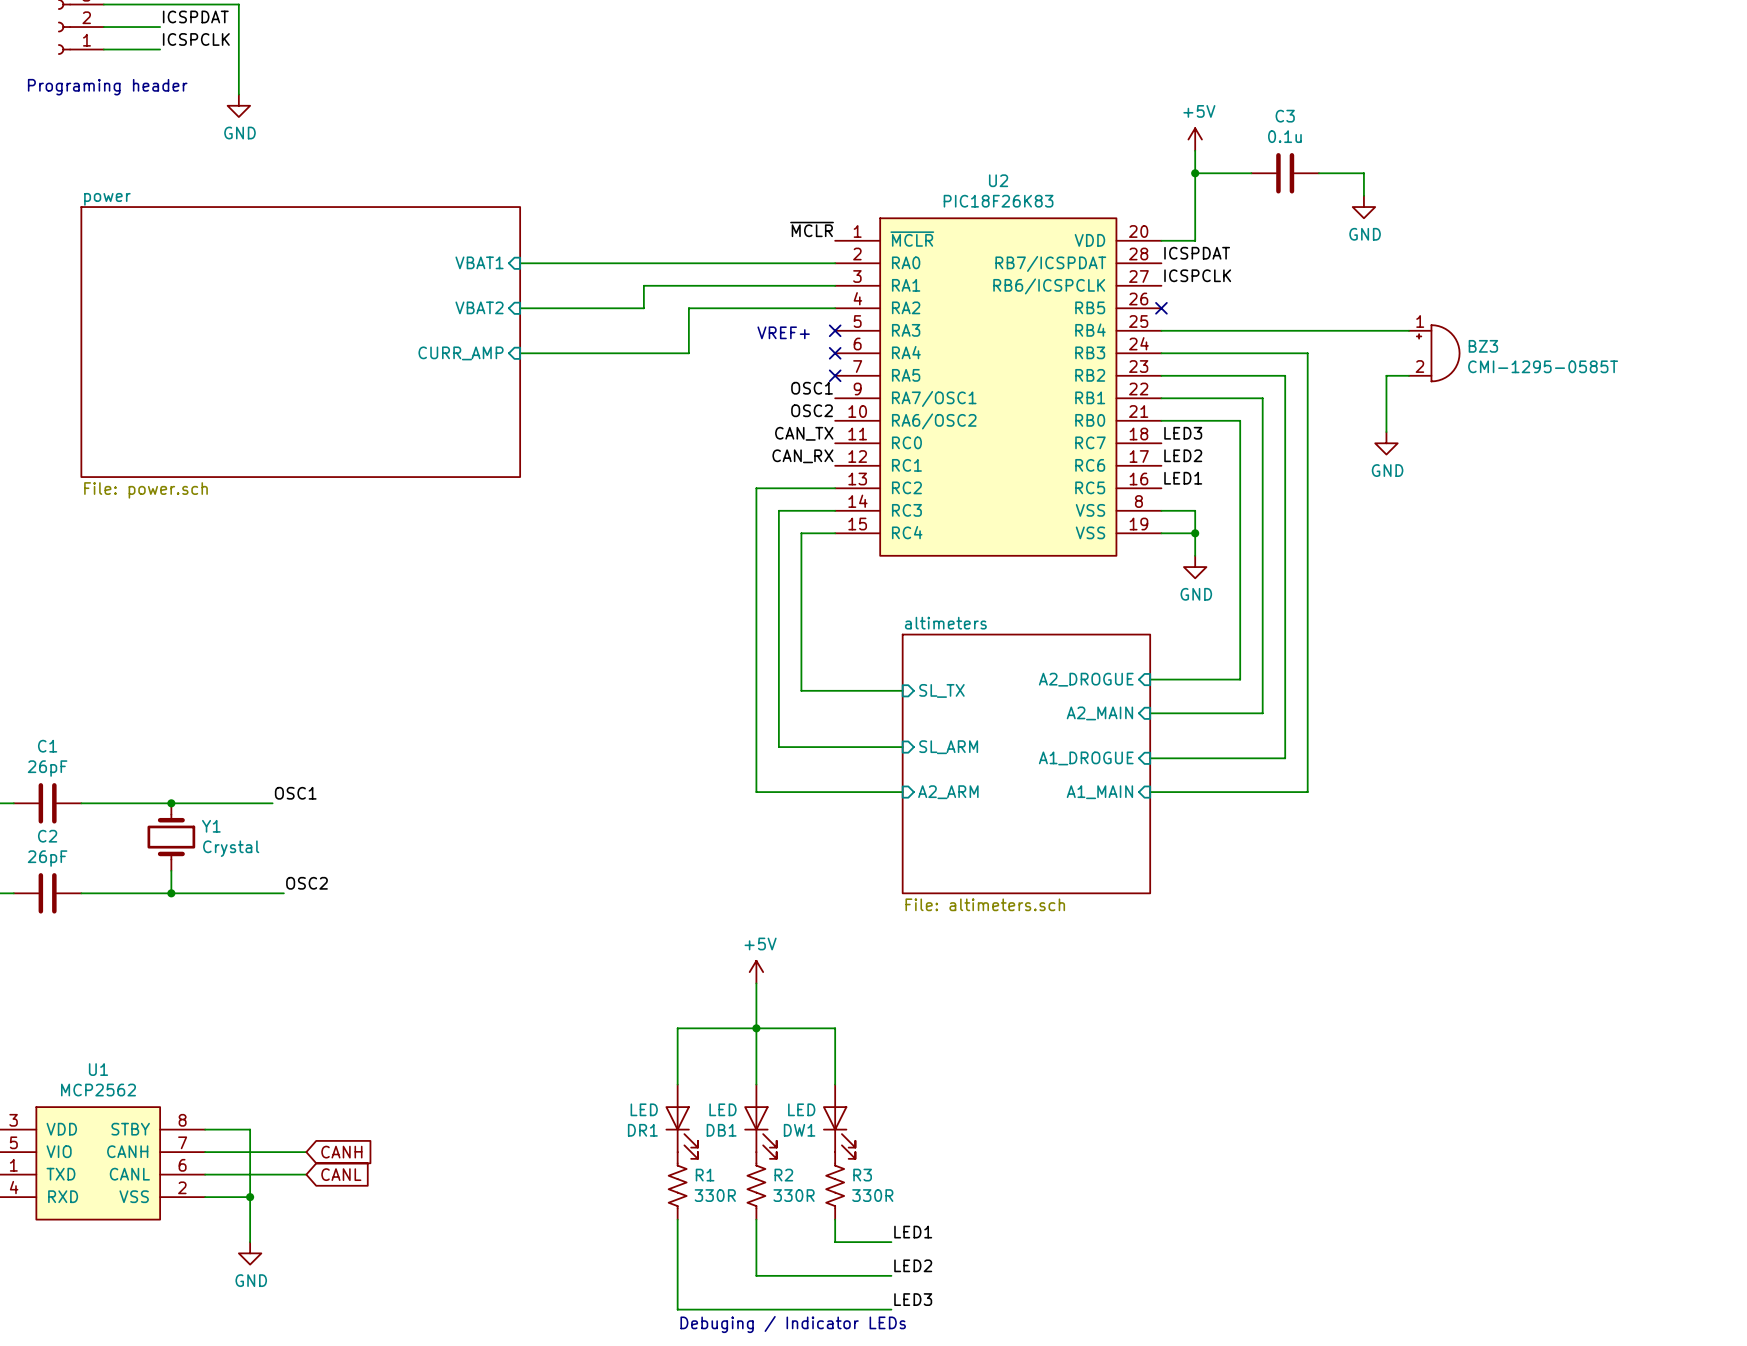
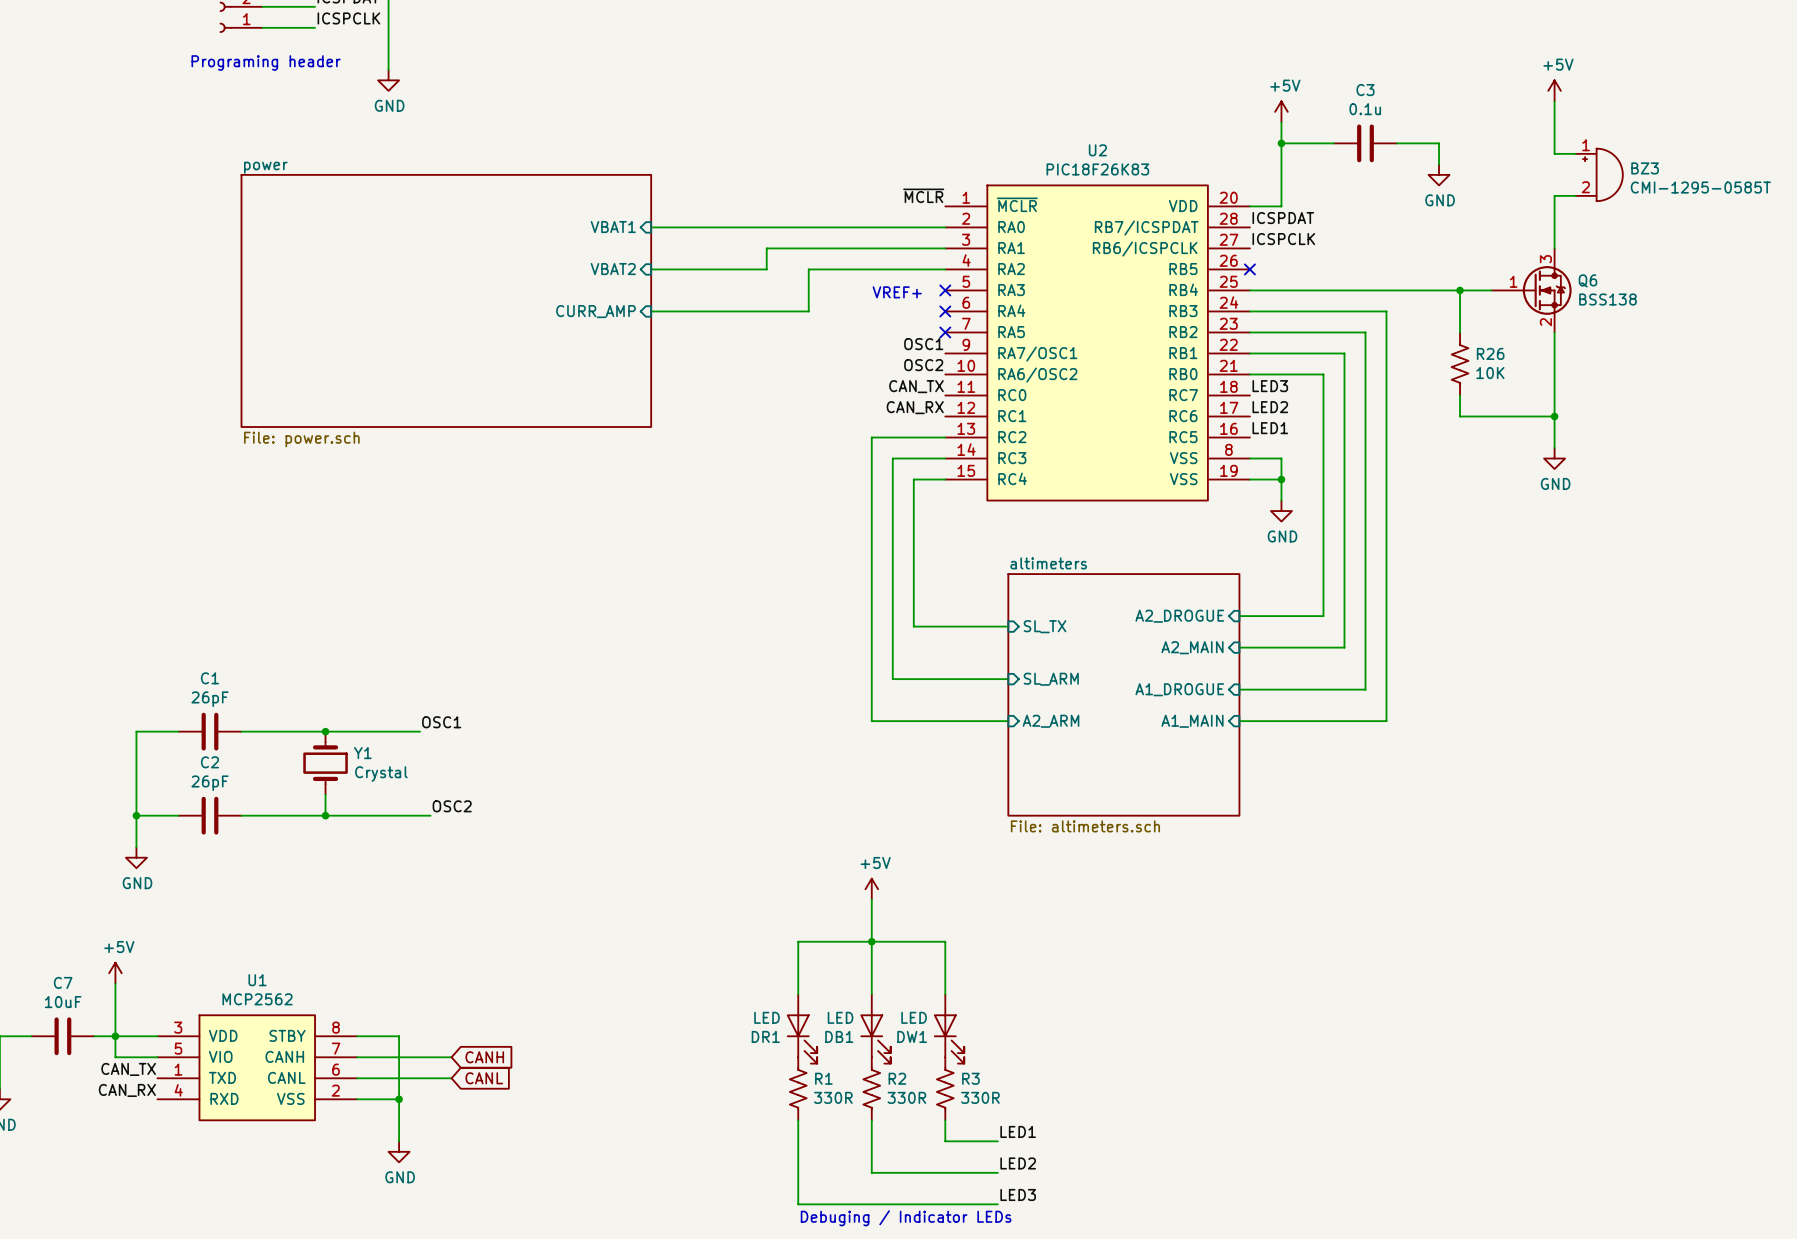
power symbol: none -> +5V (1554, 90)
wire: none -> (1554, 101) (1554, 153) (1575, 153)
wire: none -> (1460, 290) (1460, 332)
junction: none -> (1460, 290)
Q6: none -> BSS138 (1531, 290)
BZ3 position: (1434, 353) -> (1599, 174)
wire: (1408, 375) (1386, 375) (1386, 432) -> (1575, 195) (1554, 195) (1554, 248)
wire: none -> (1554, 332) (1554, 448)
R26: none -> 10K (1460, 363)
wire: none -> (1460, 395) (1460, 416) (1554, 416)
power symbol position: GND (1386, 443) -> GND (1554, 458)
junction: none -> (1554, 416)

